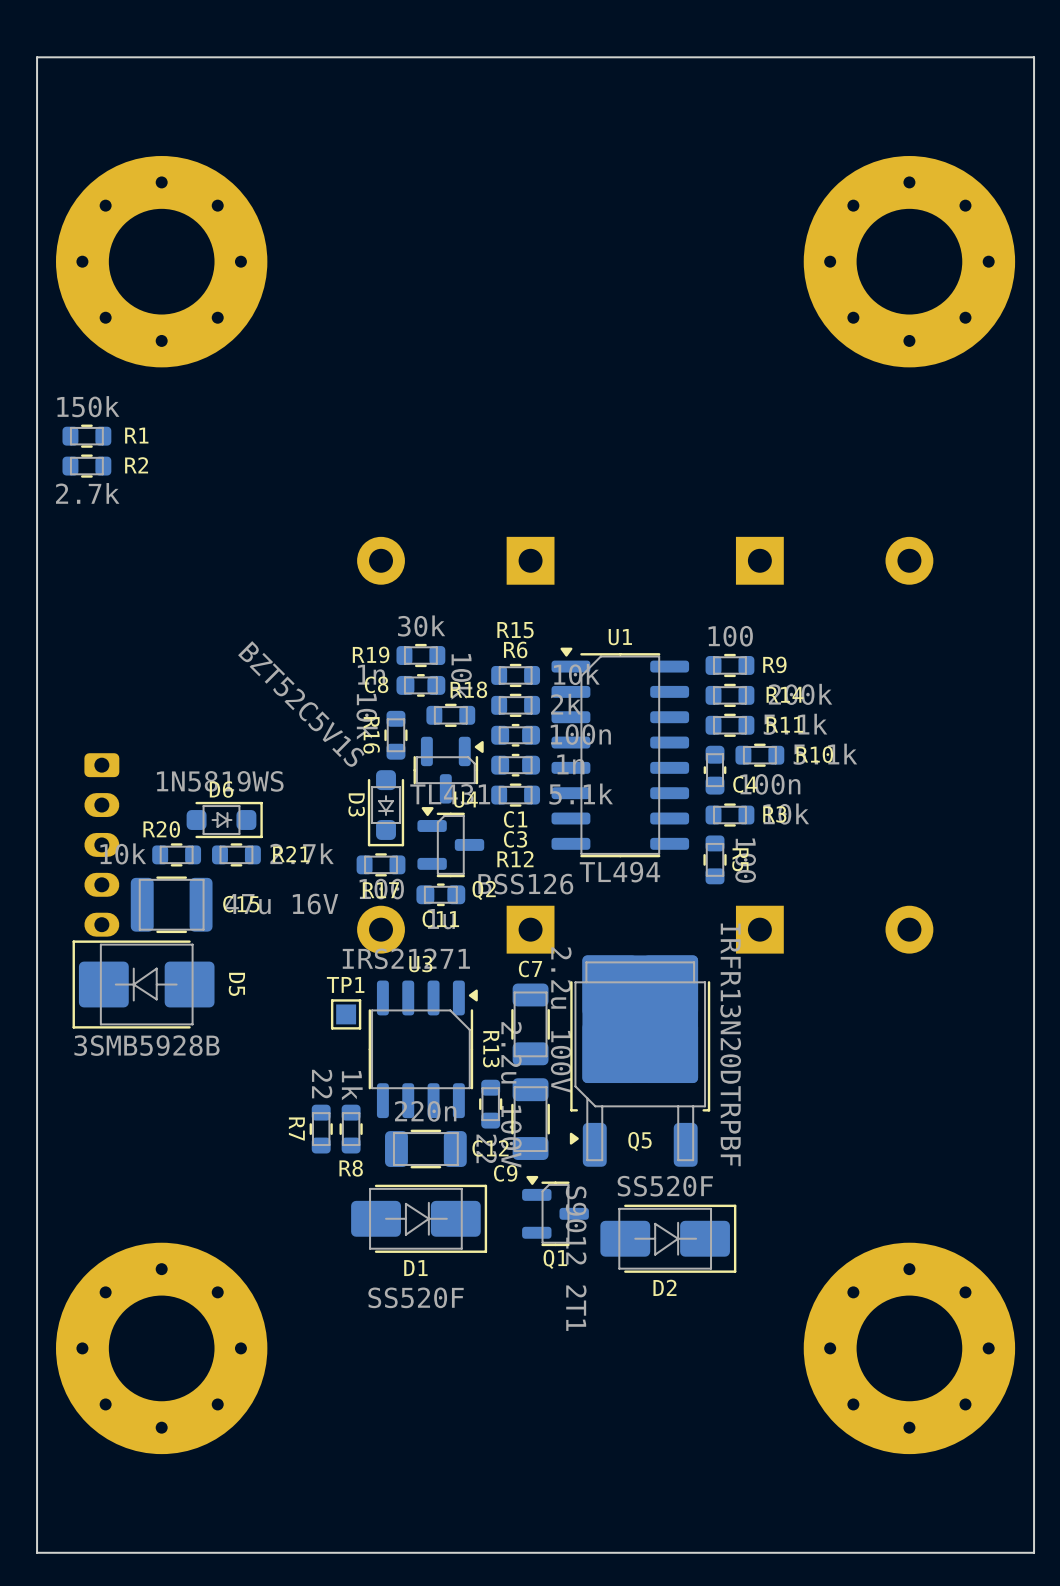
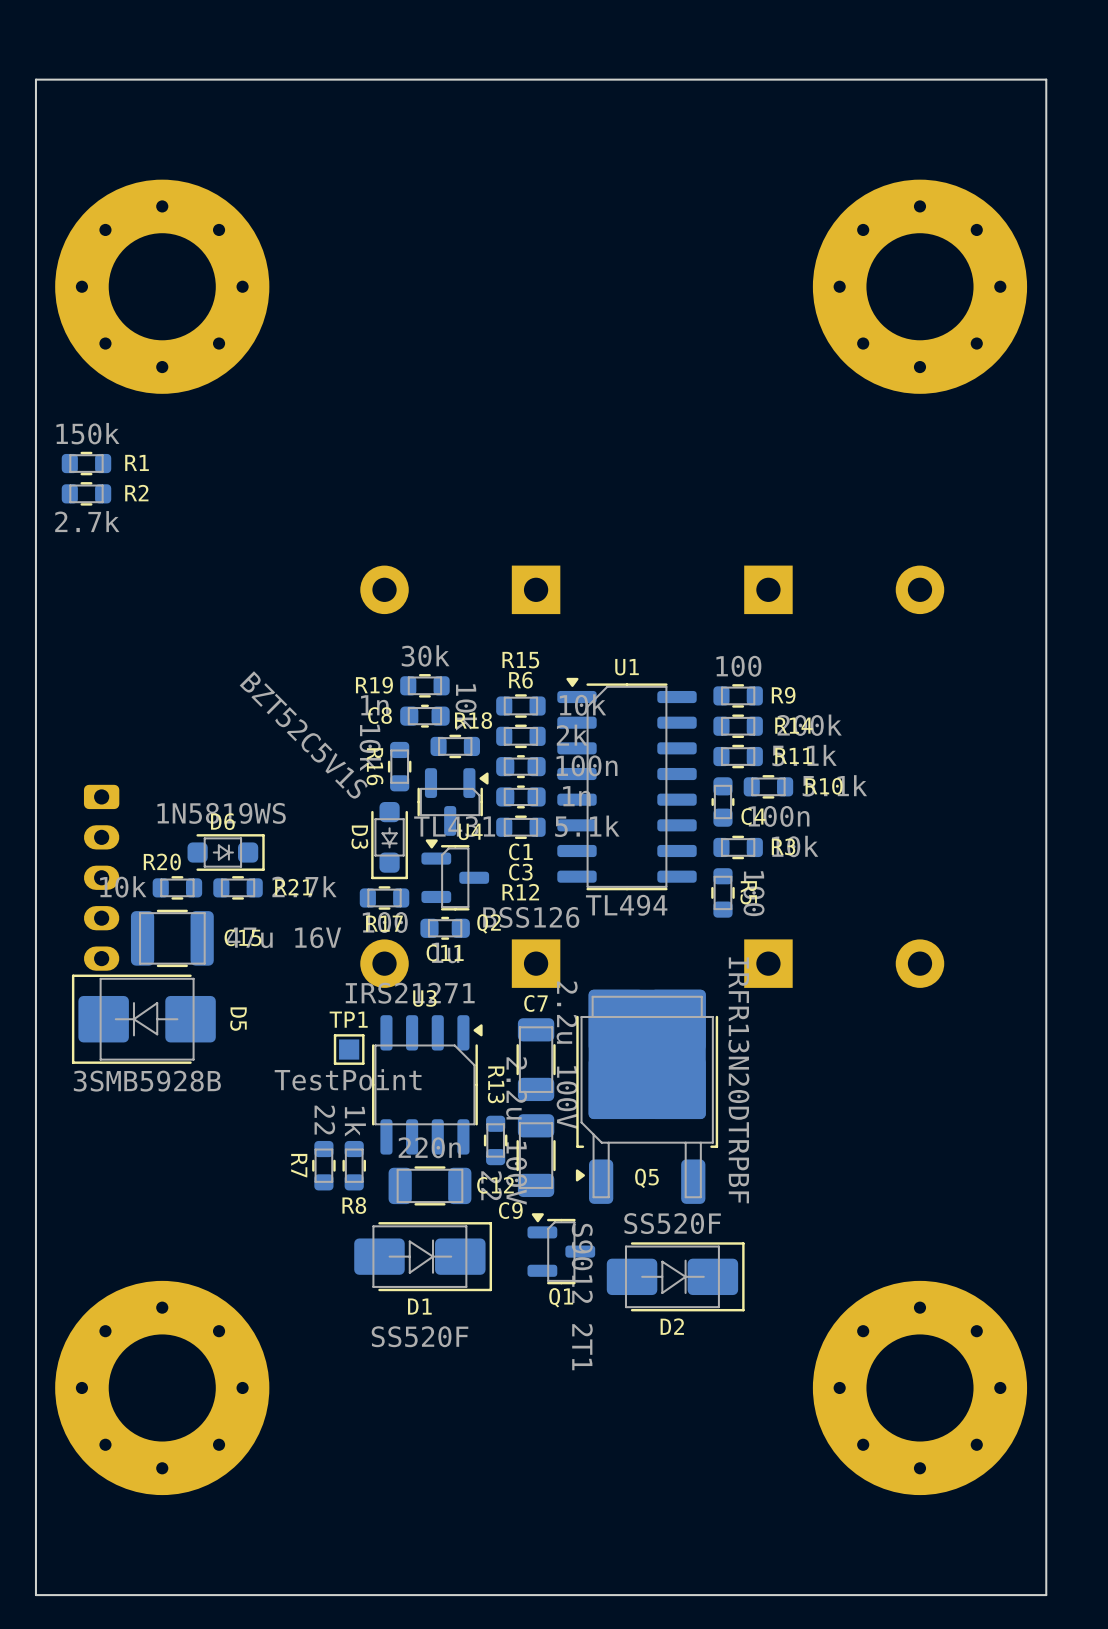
TP1 value: none -> TestPoint (348, 1079)

